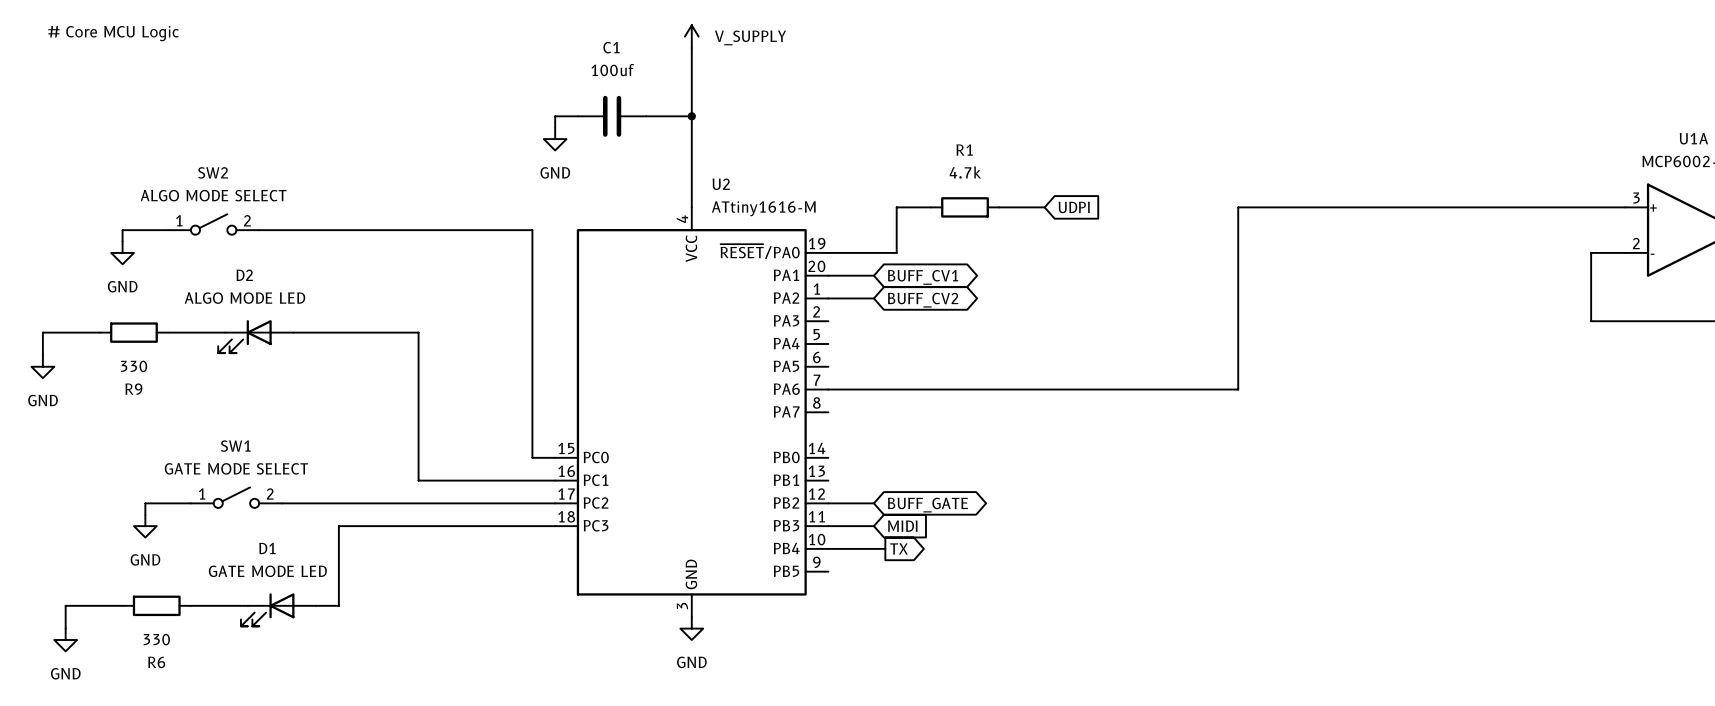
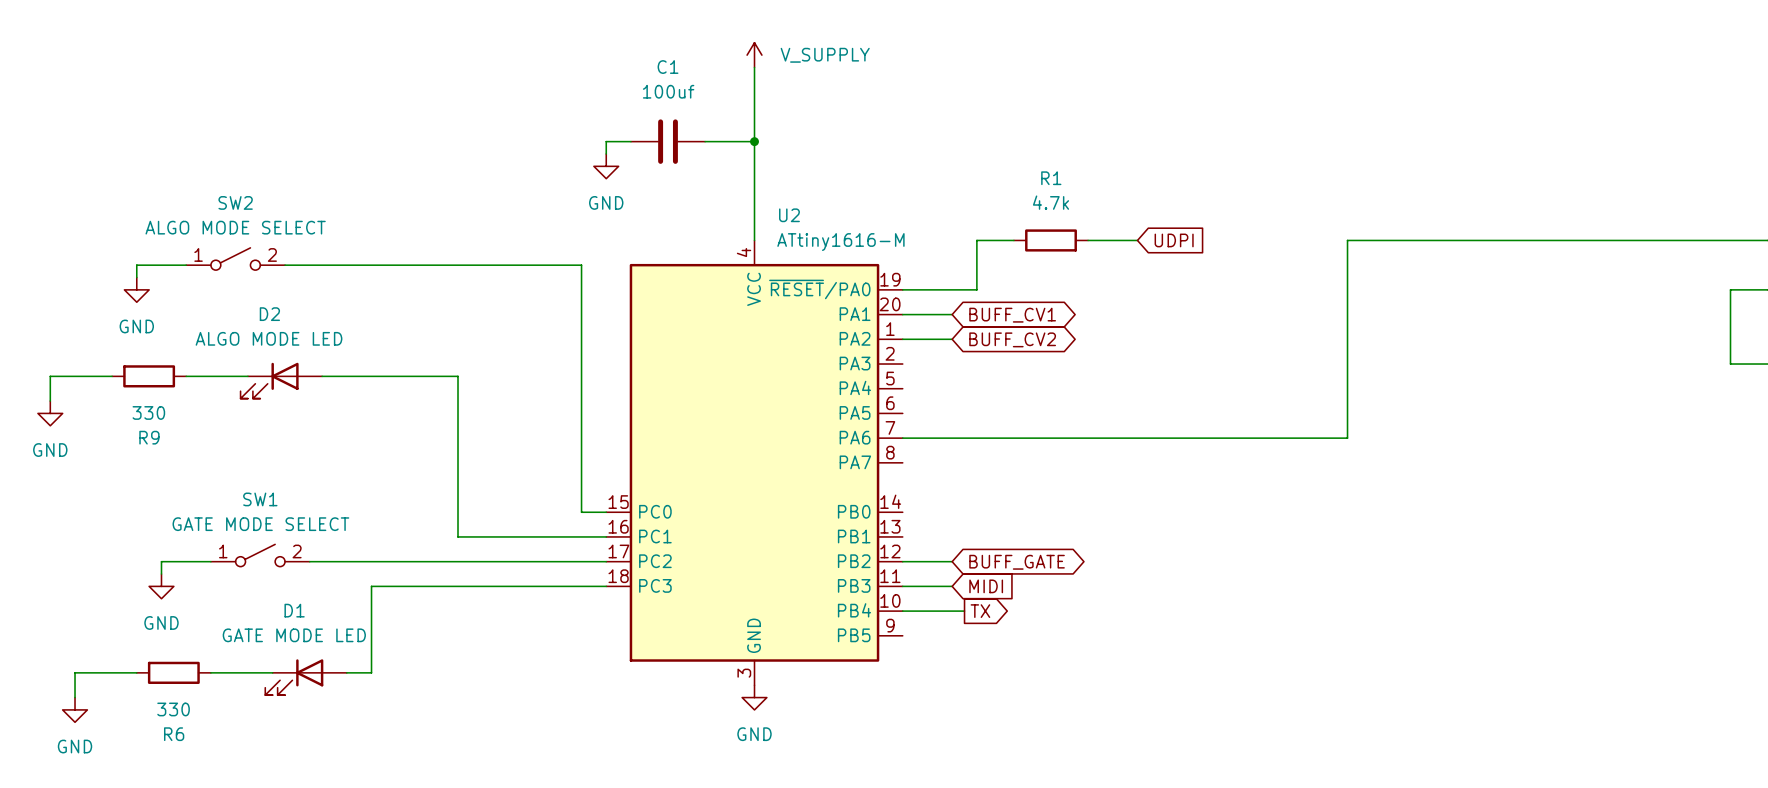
text: # Core MCU Logic (113, 33) -> none

